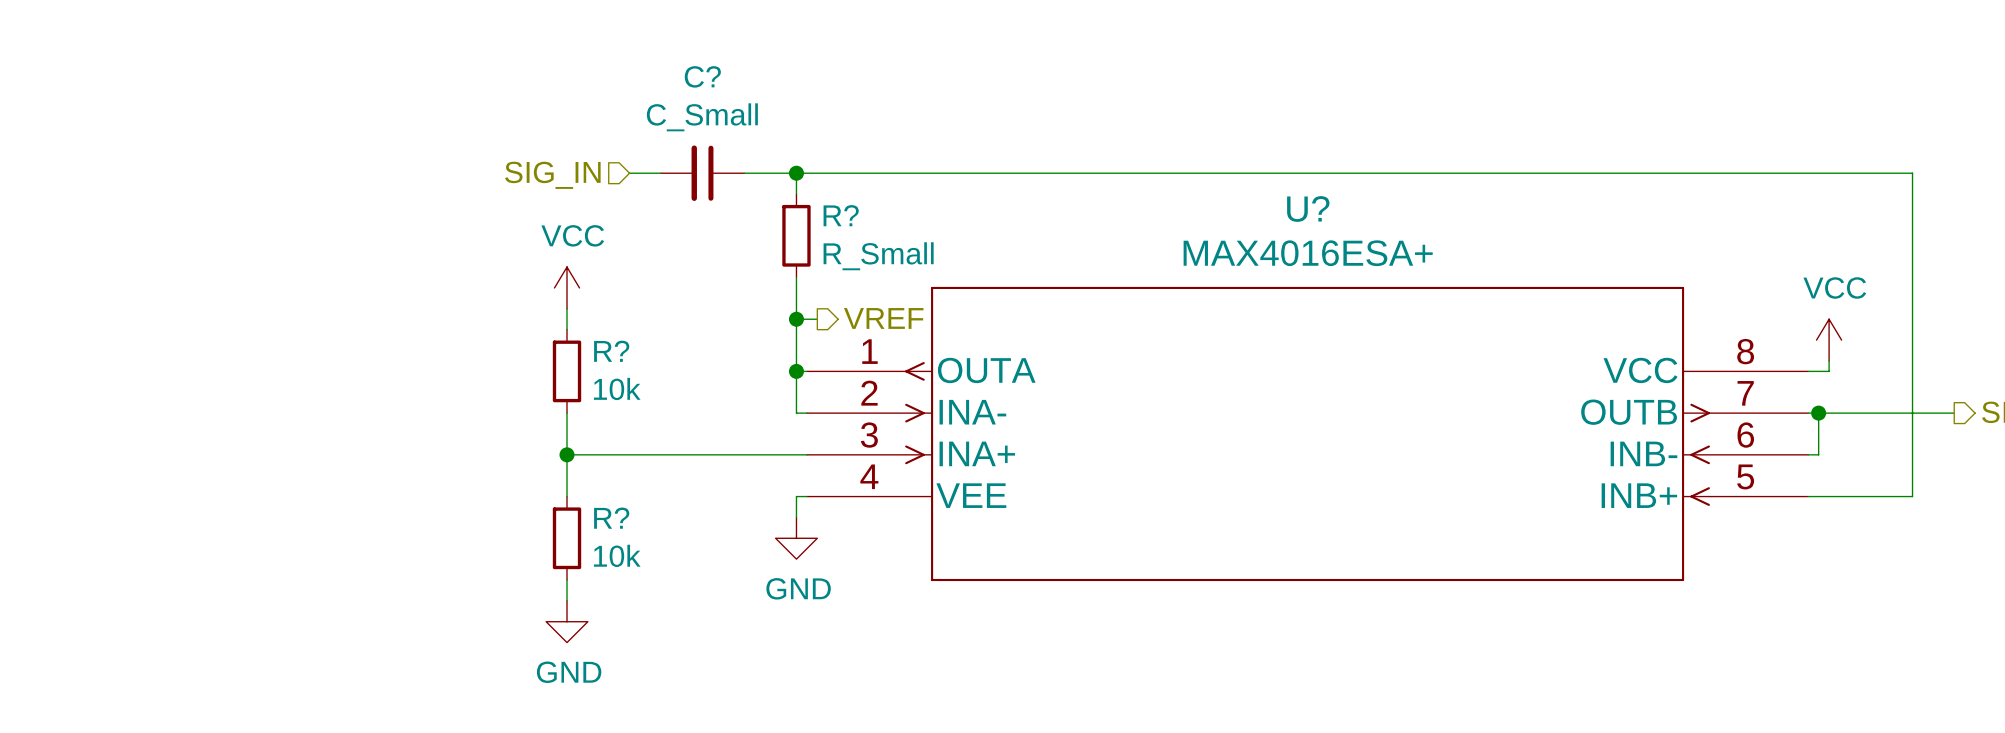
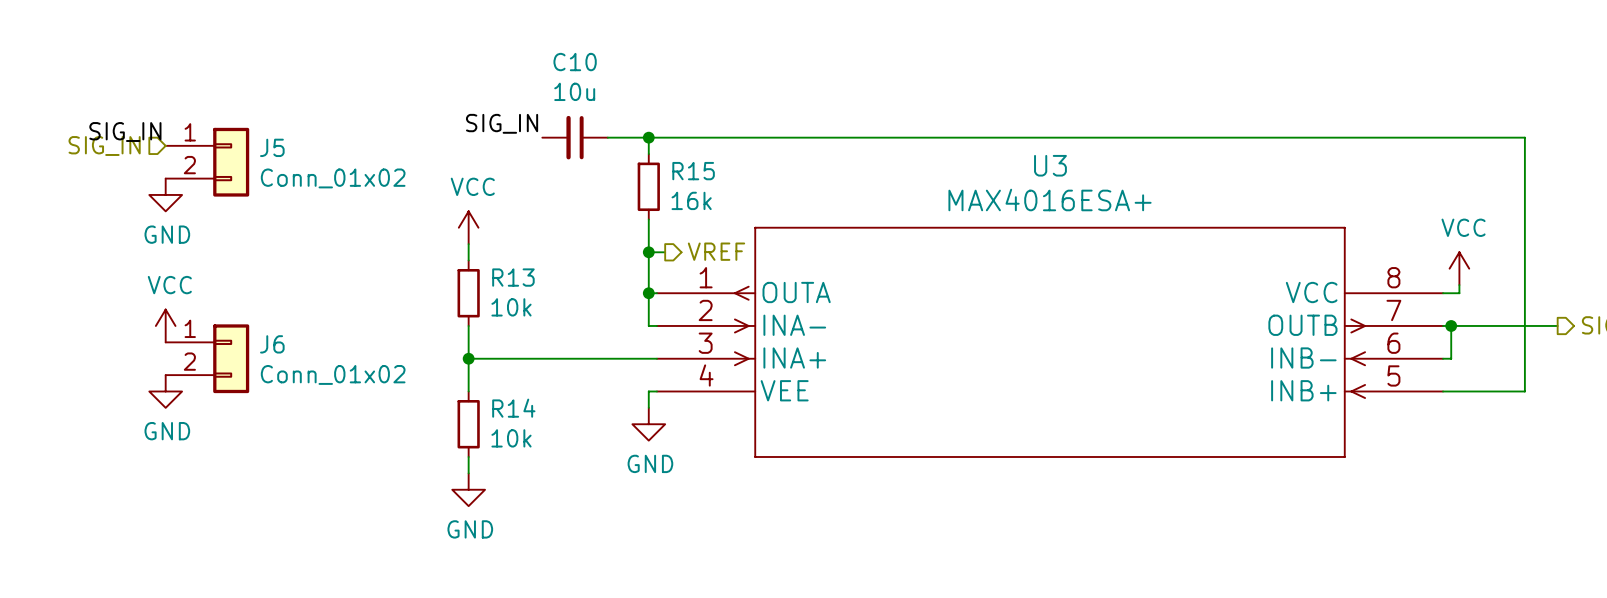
C? name: C? (702, 76) -> C10 (575, 62)
C? value: C_Small (702, 117) -> 10u (574, 91)
label: none -> SIG_IN (502, 123)
label: none -> SIG_IN (125, 132)
wire: (629, 173) (660, 173) -> none
hierarchical label: SIG_IN (552, 175) -> none
hierarchical label: none -> SIG_IN (104, 146)
J5: none -> Conn_01x02 (207, 162)
U? name: U? (1308, 208) -> U3 (1050, 165)
R? name: R? (841, 215) -> R15 (693, 171)
power symbol: none -> GND (165, 194)
R? value: R_Small (878, 256) -> 16k (691, 200)
R? name: R? (611, 351) -> R13 (513, 277)
power symbol: none -> VCC (165, 325)
J6: none -> Conn_01x02 (207, 358)
power symbol: none -> GND (165, 391)
R? name: R? (611, 518) -> R14 (513, 408)

